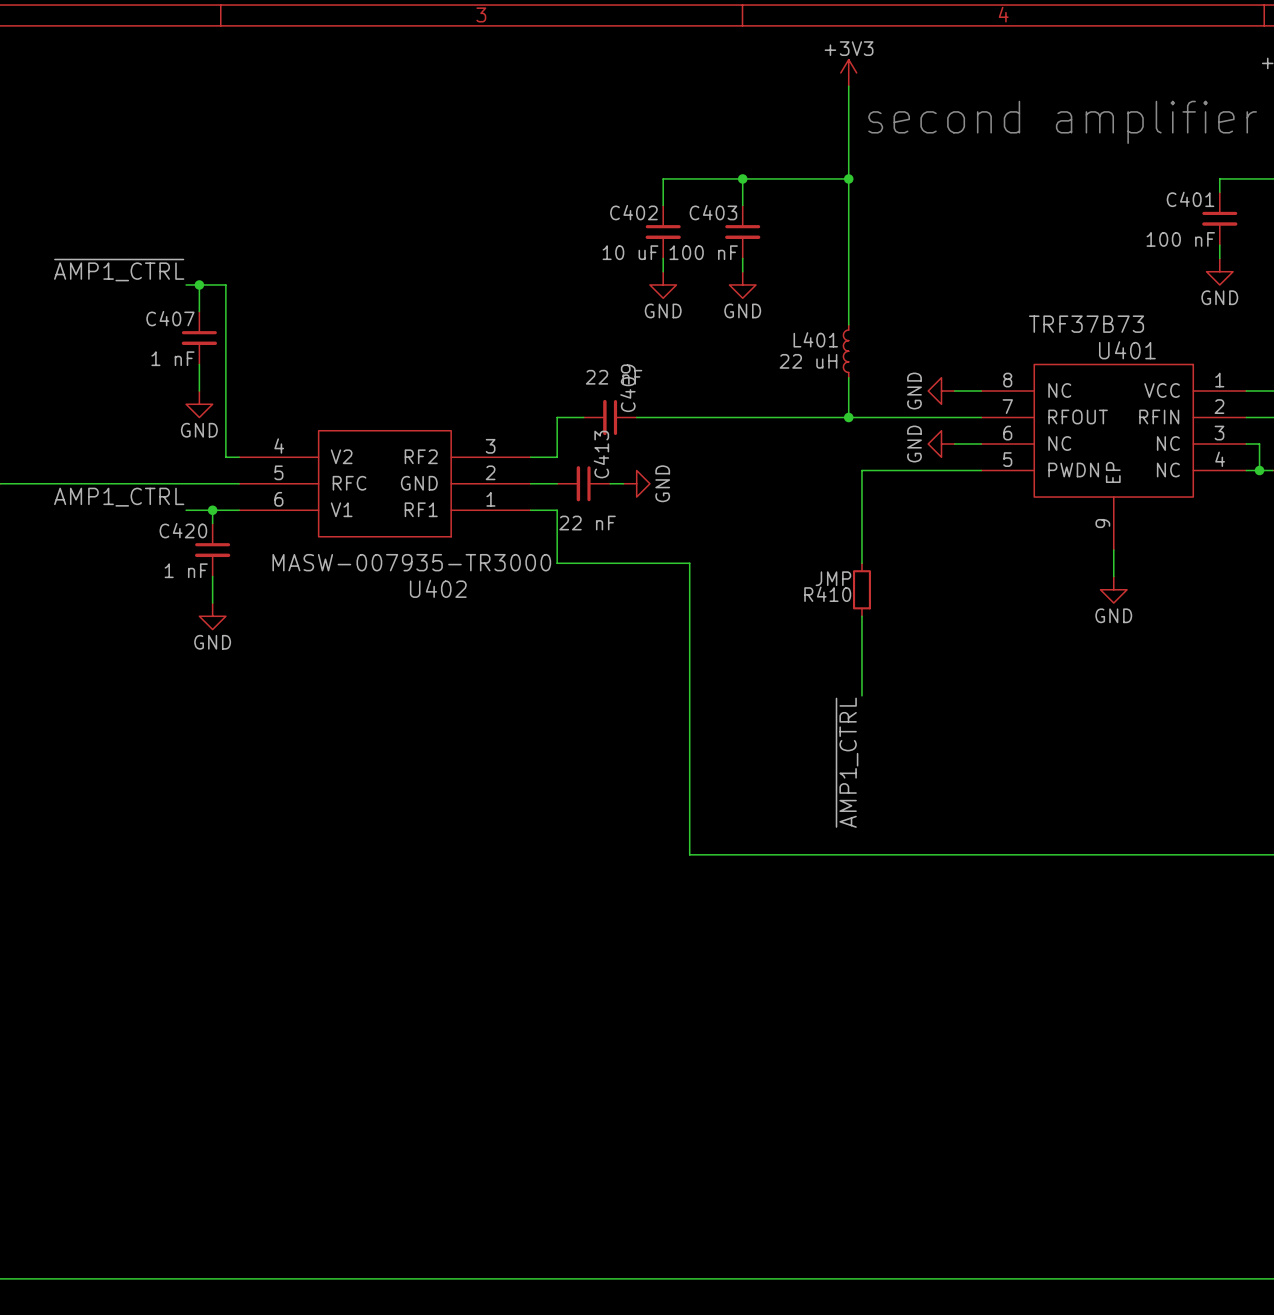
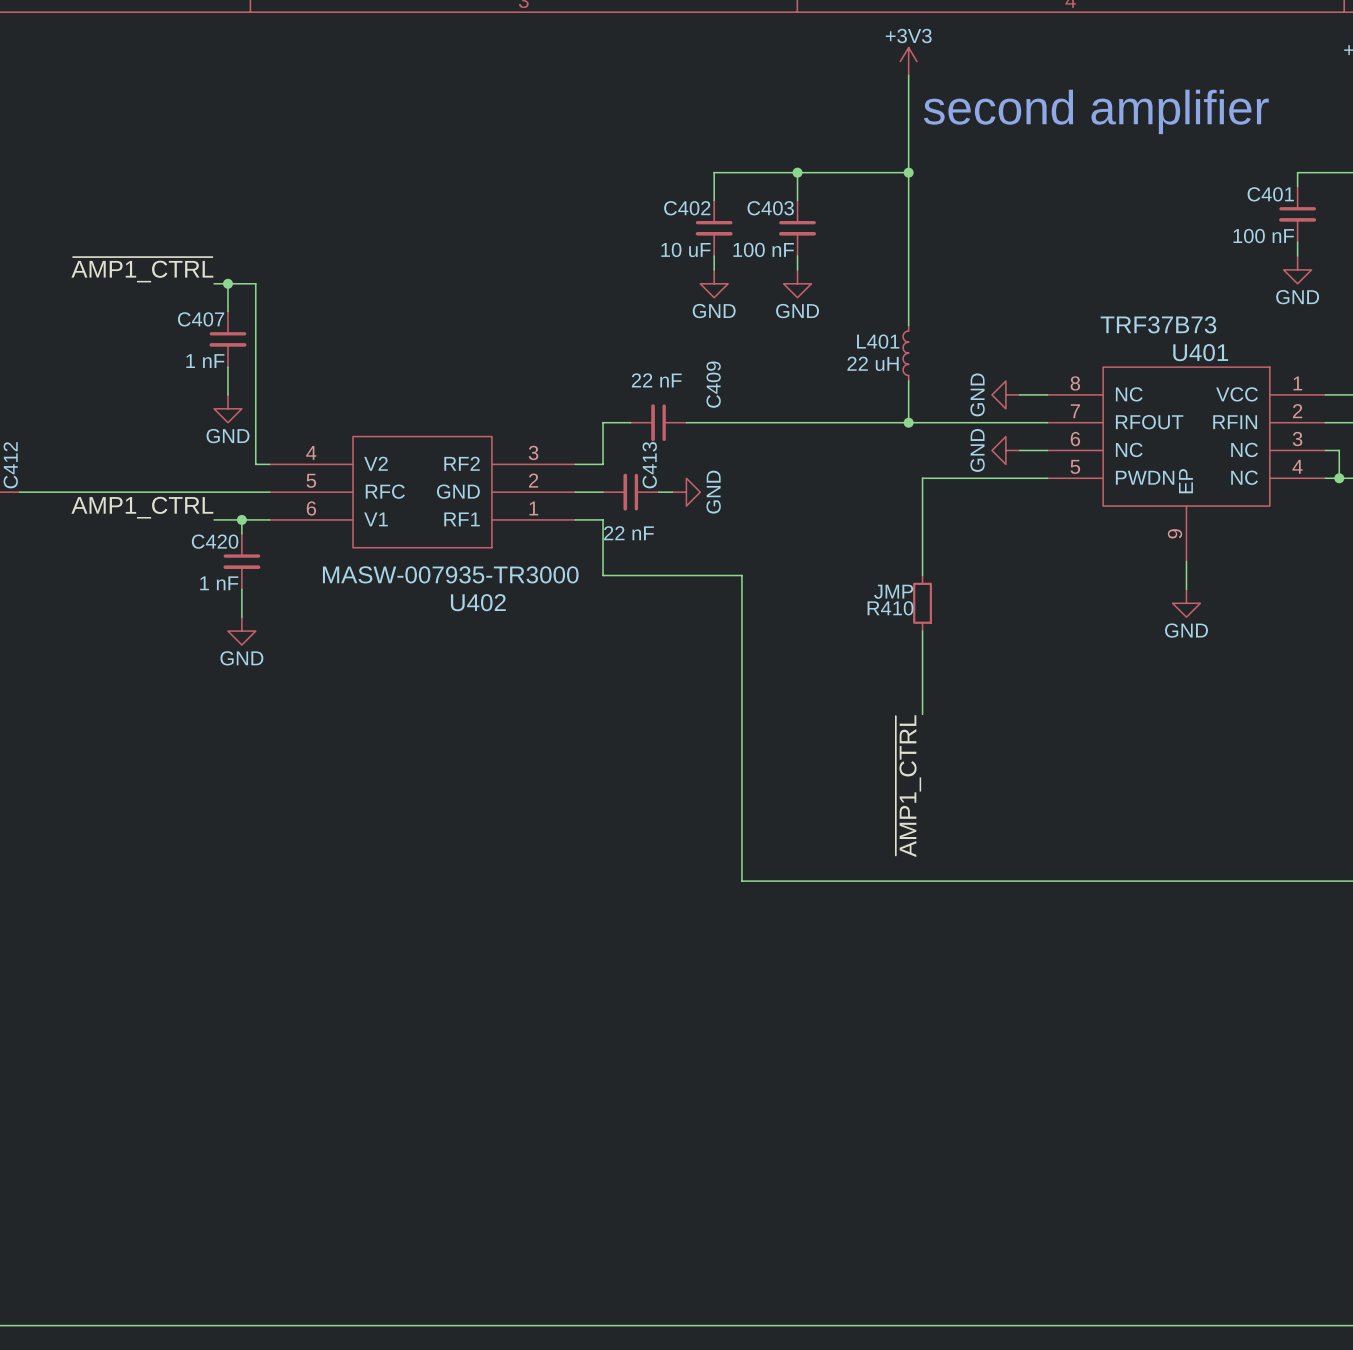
C409 name position: C409 (627, 388) -> C409 (713, 384)

